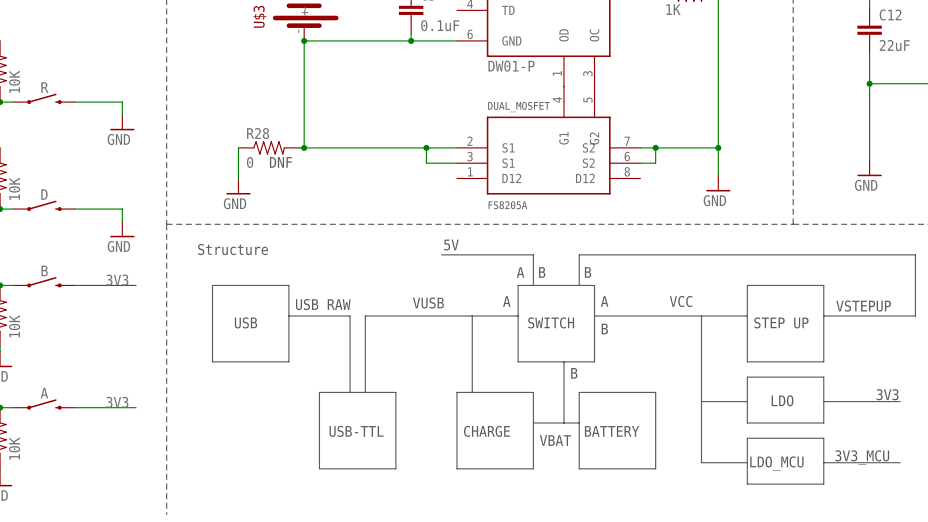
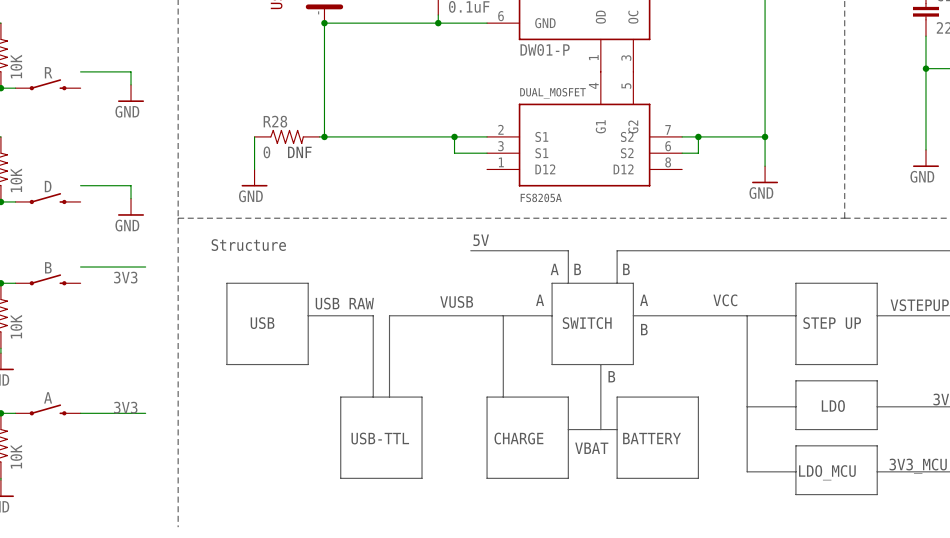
wire: (74, 102) (122, 102) (122, 114) -> (80, 71) (131, 71) (131, 84)
power symbol position: GND (122, 122) -> GND (131, 93)
wire: (74, 209) (122, 209) (122, 221) -> (80, 185) (131, 185) (131, 198)
power symbol position: GND (122, 229) -> GND (131, 207)
wire: (74, 285) (136, 285) -> (80, 267) (145, 267)

